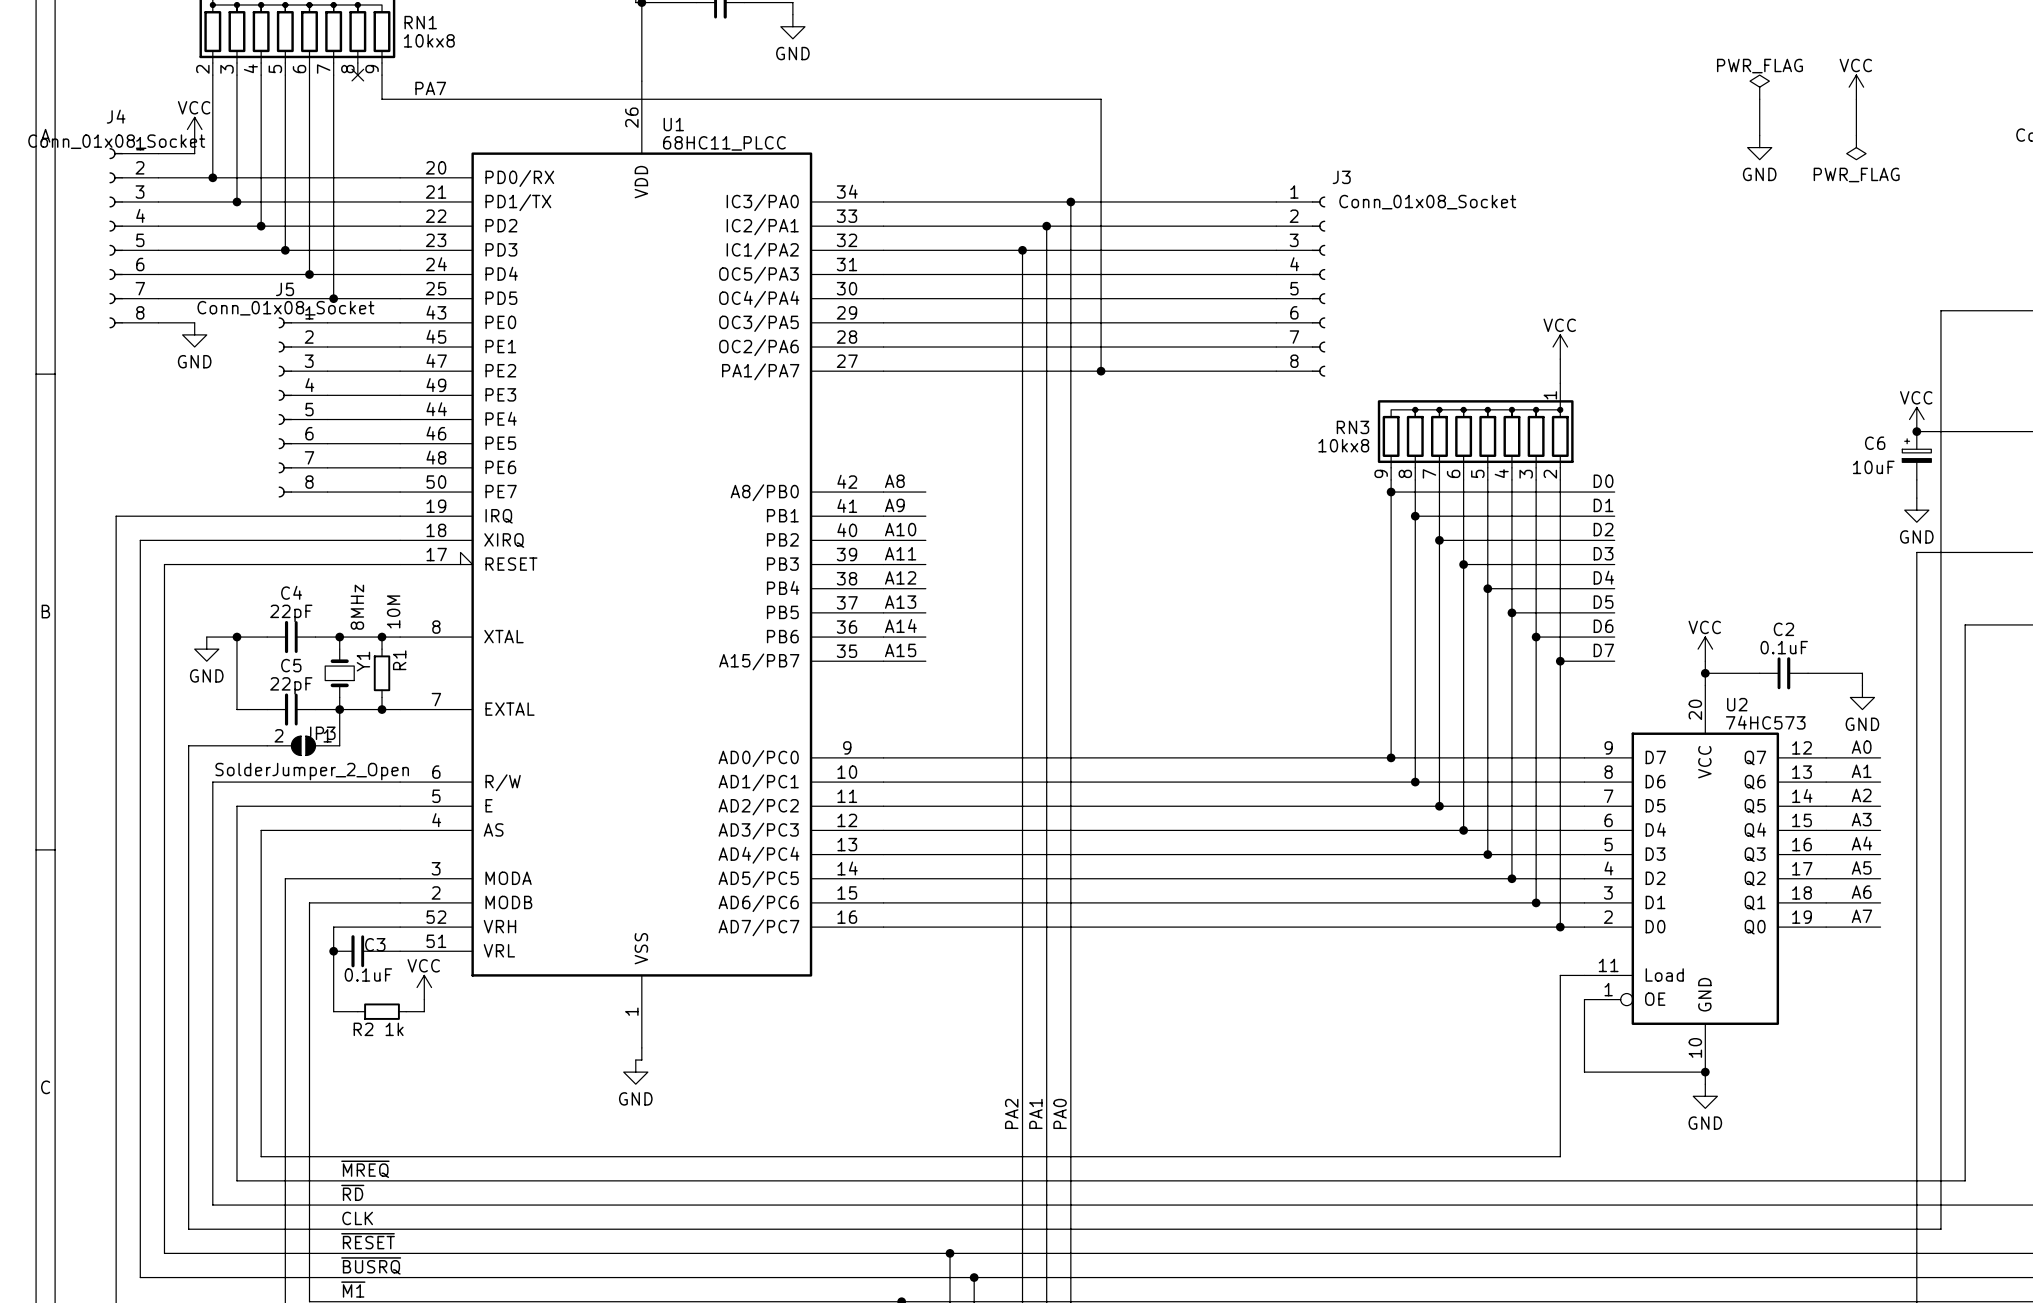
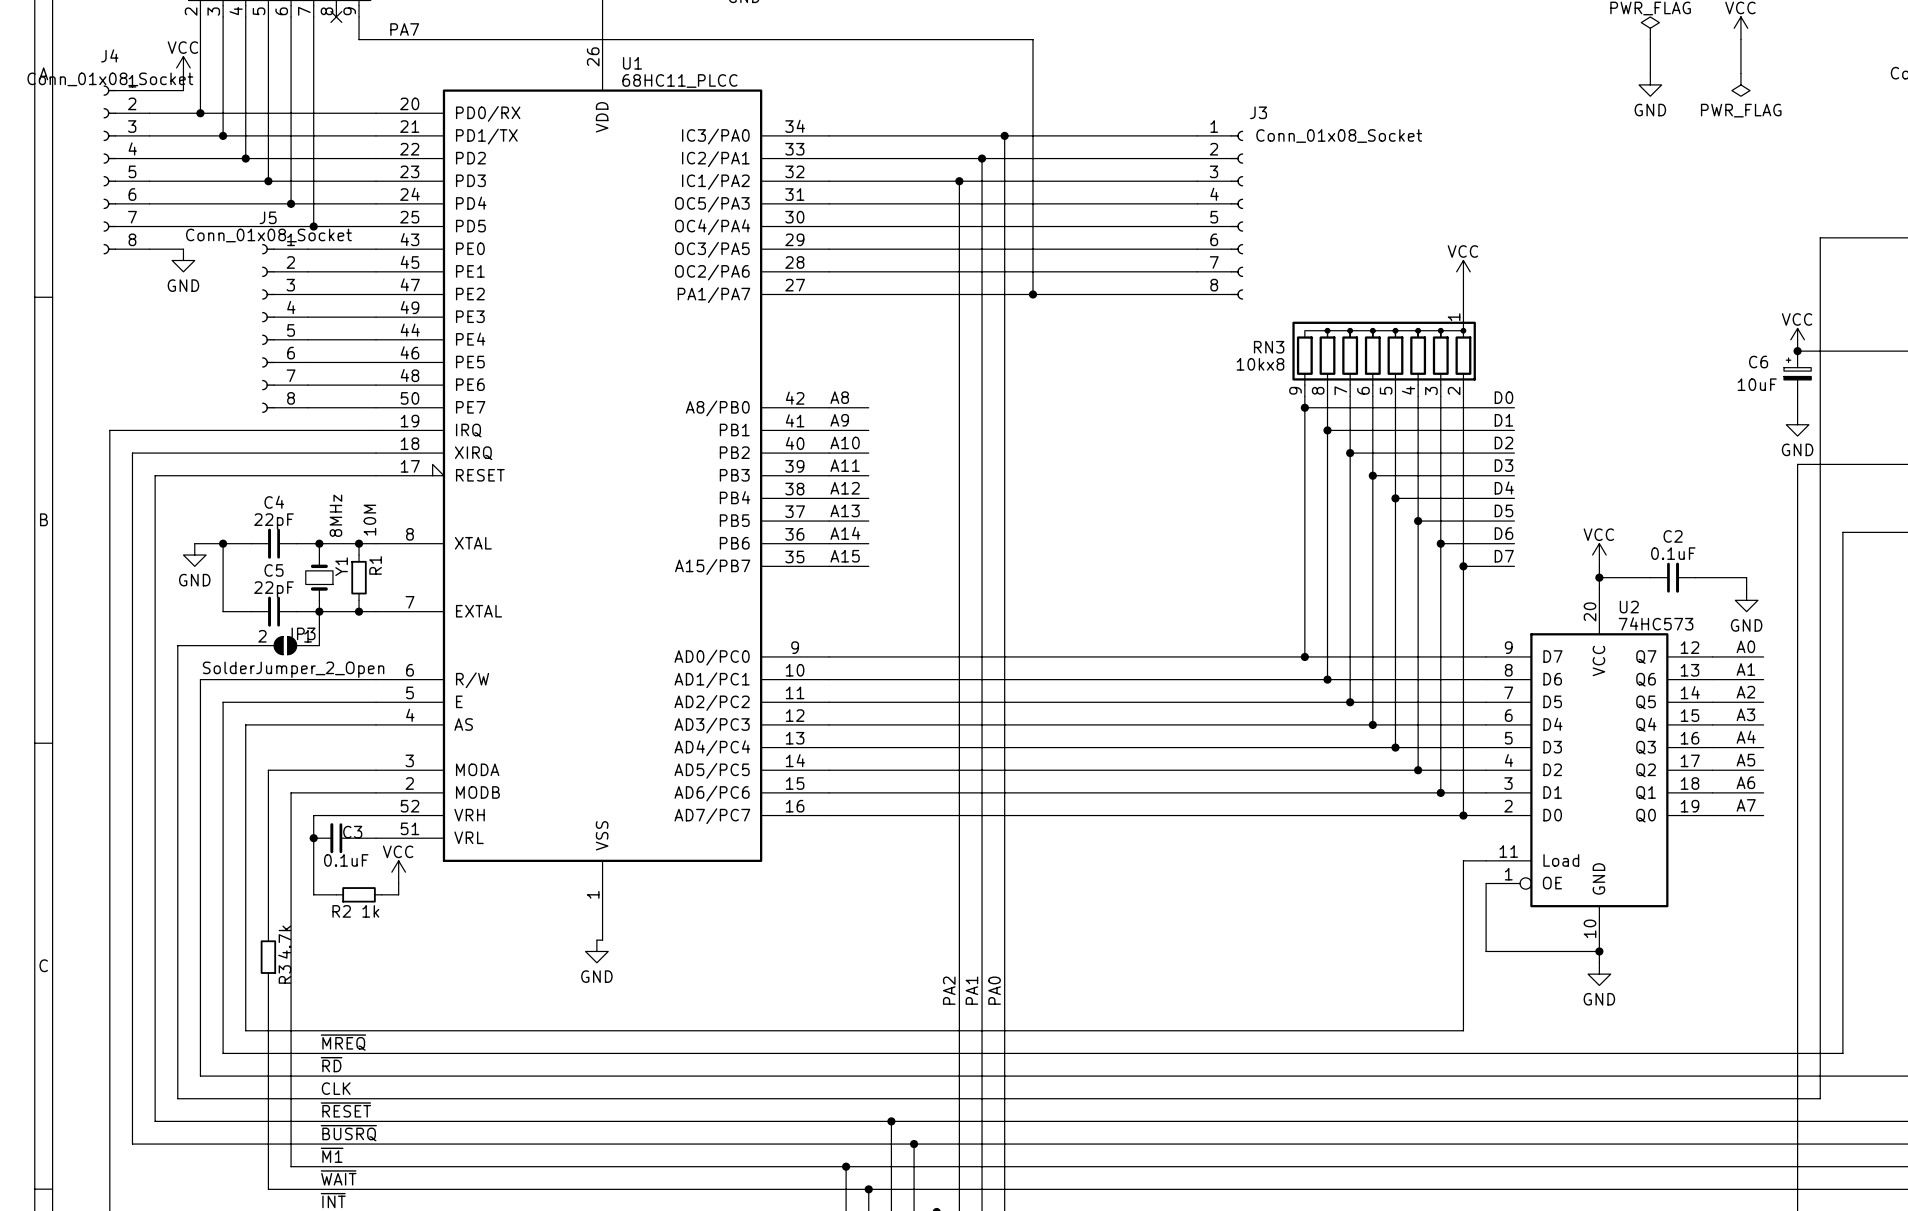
wire: (285, 1053) (285, 1102) -> none
R3: none -> 4.7k (268, 957)

